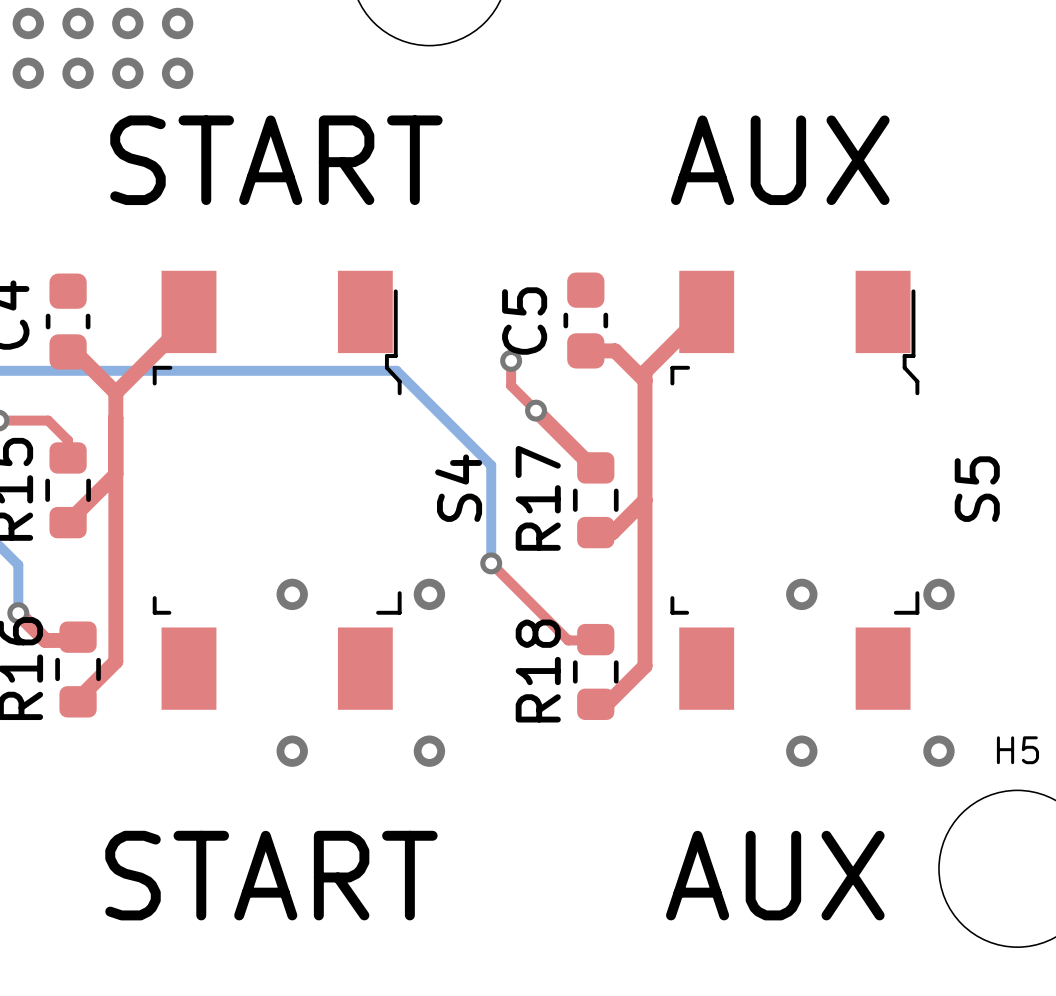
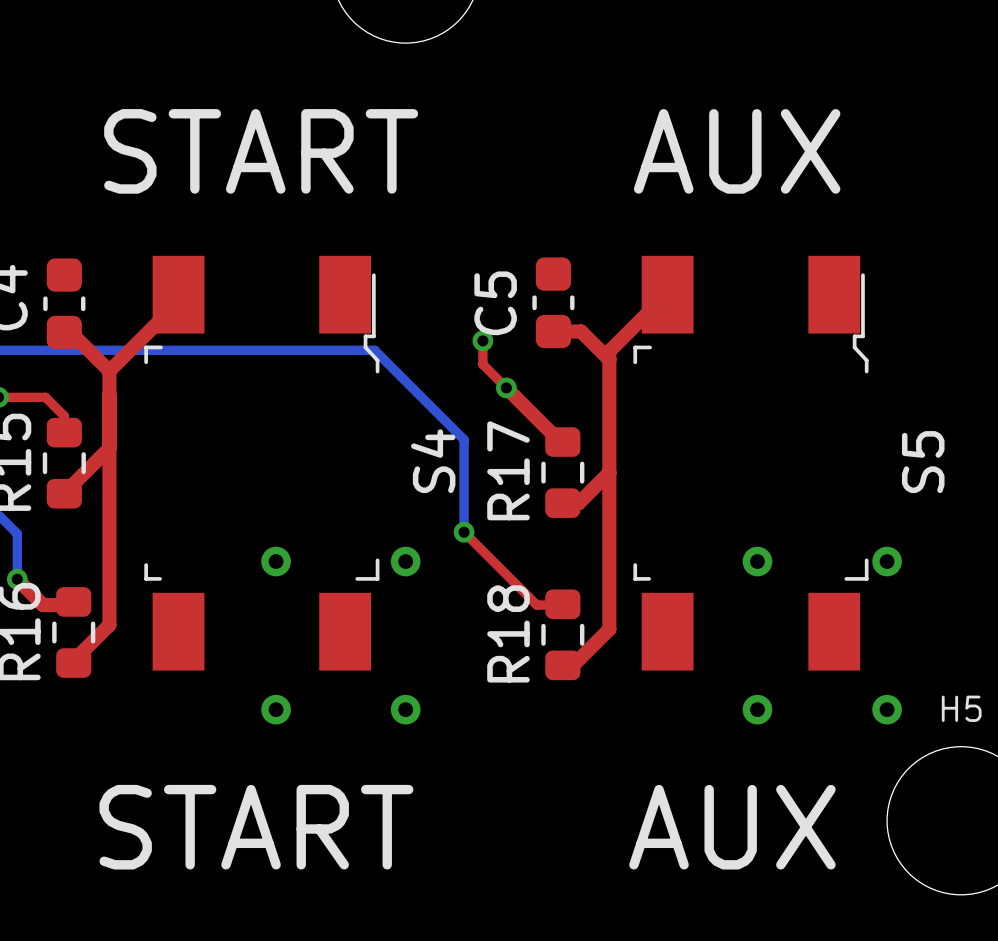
via: (28, 23) -> none
via: (78, 23) -> none
via: (127, 23) -> none
via: (177, 23) -> none
via: (28, 73) -> none
via: (78, 73) -> none
via: (127, 73) -> none
via: (177, 73) -> none

